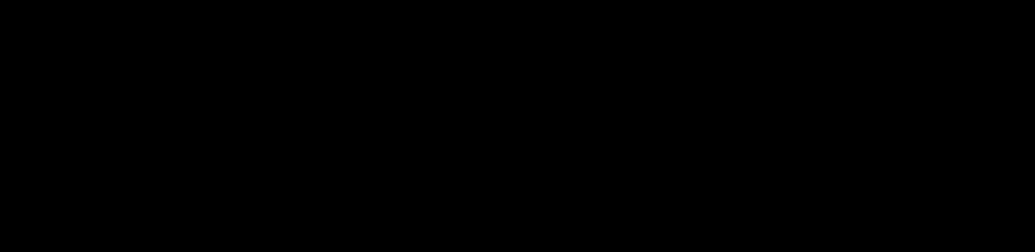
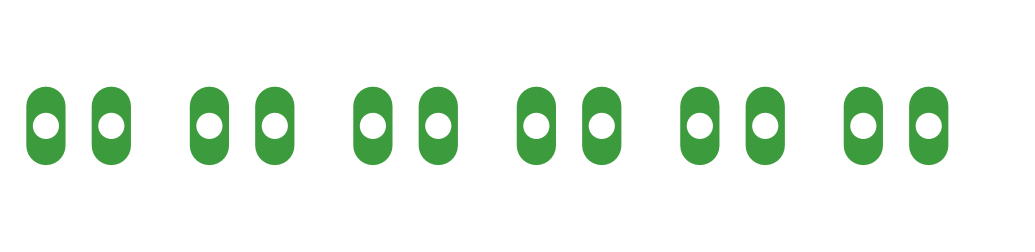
part: none -> (78, 125)
part: none -> (242, 125)
part: none -> (405, 125)
part: none -> (569, 125)
part: none -> (732, 125)
part: none -> (896, 125)

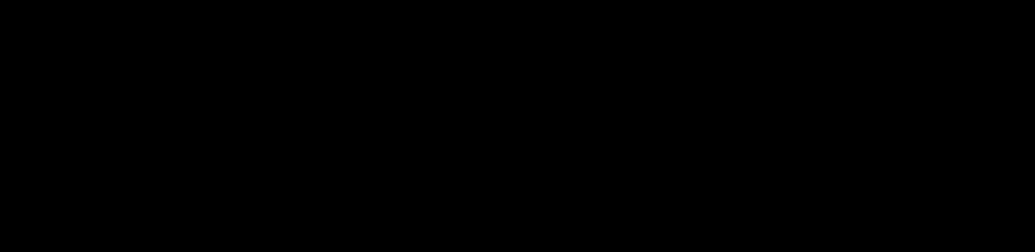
part: (78, 125) -> none
part: (242, 125) -> none
part: (405, 125) -> none
part: (569, 125) -> none
part: (732, 125) -> none
part: (896, 125) -> none

